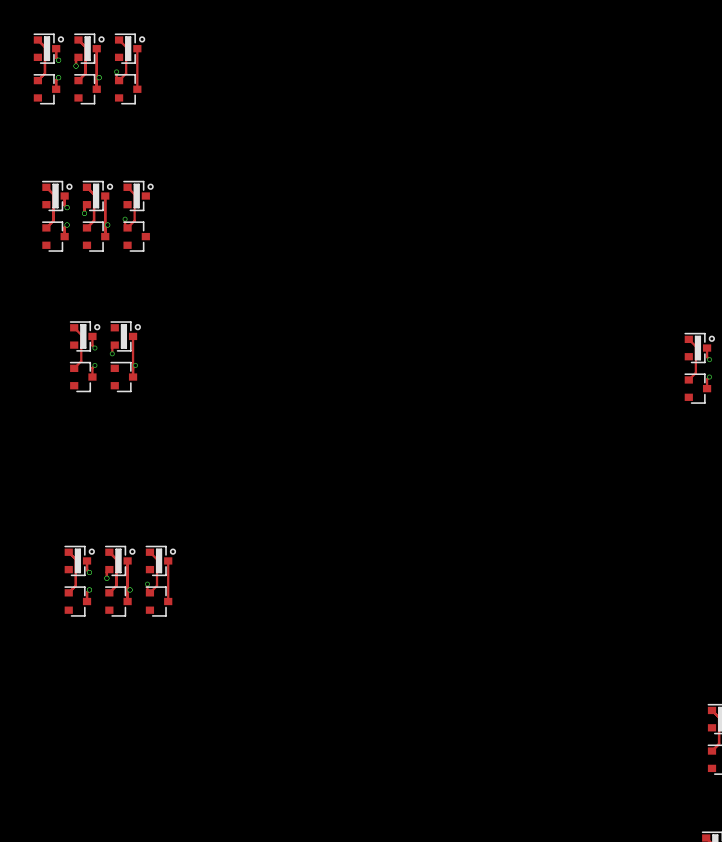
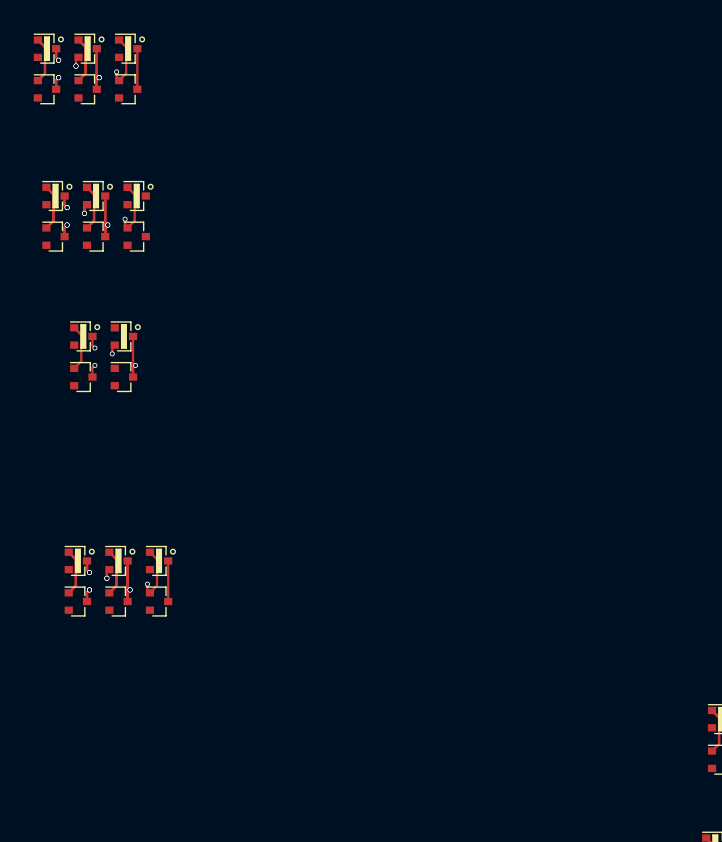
track: (688, 339) (695, 346) (695, 372) (688, 379) -> none
part: (699, 348) -> none
track: (707, 348) (707, 357) (709, 359) -> none
via: (709, 359) -> none
track: (709, 377) (707, 379) (707, 388) -> none
via: (709, 377) -> none
part: (697, 388) -> none

